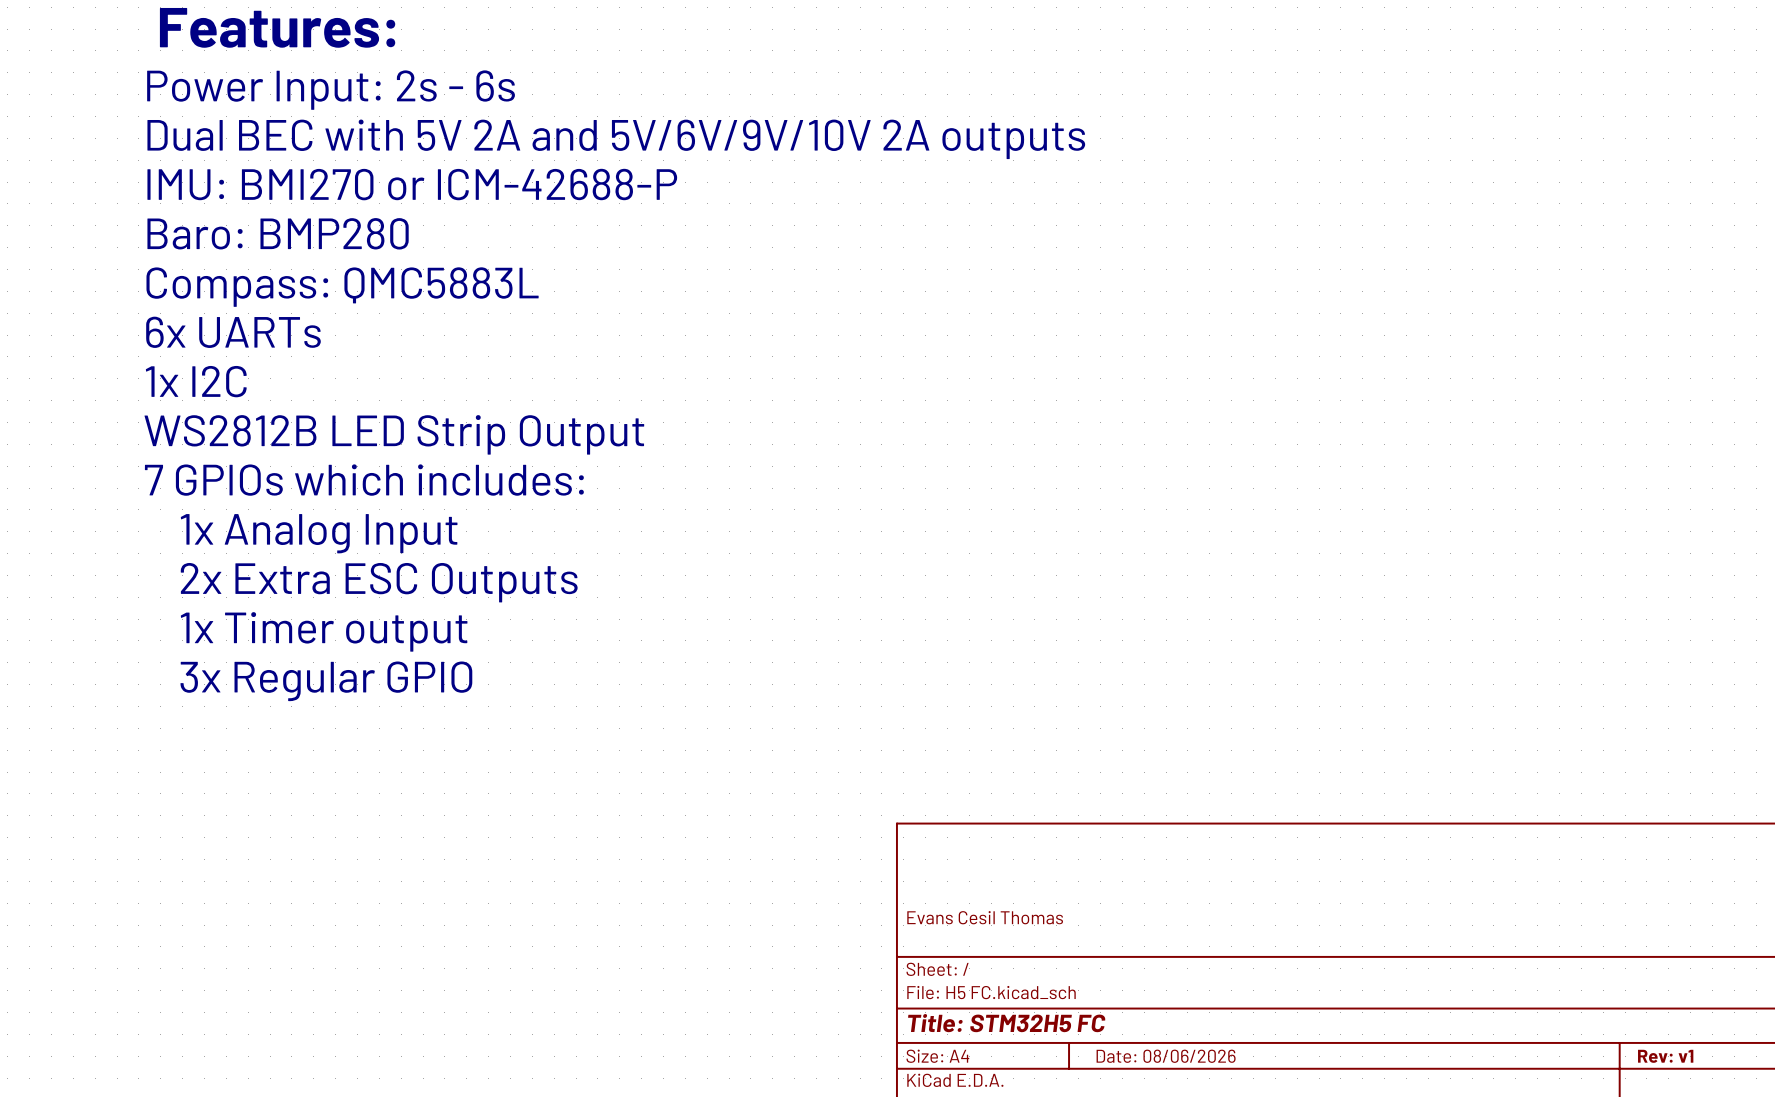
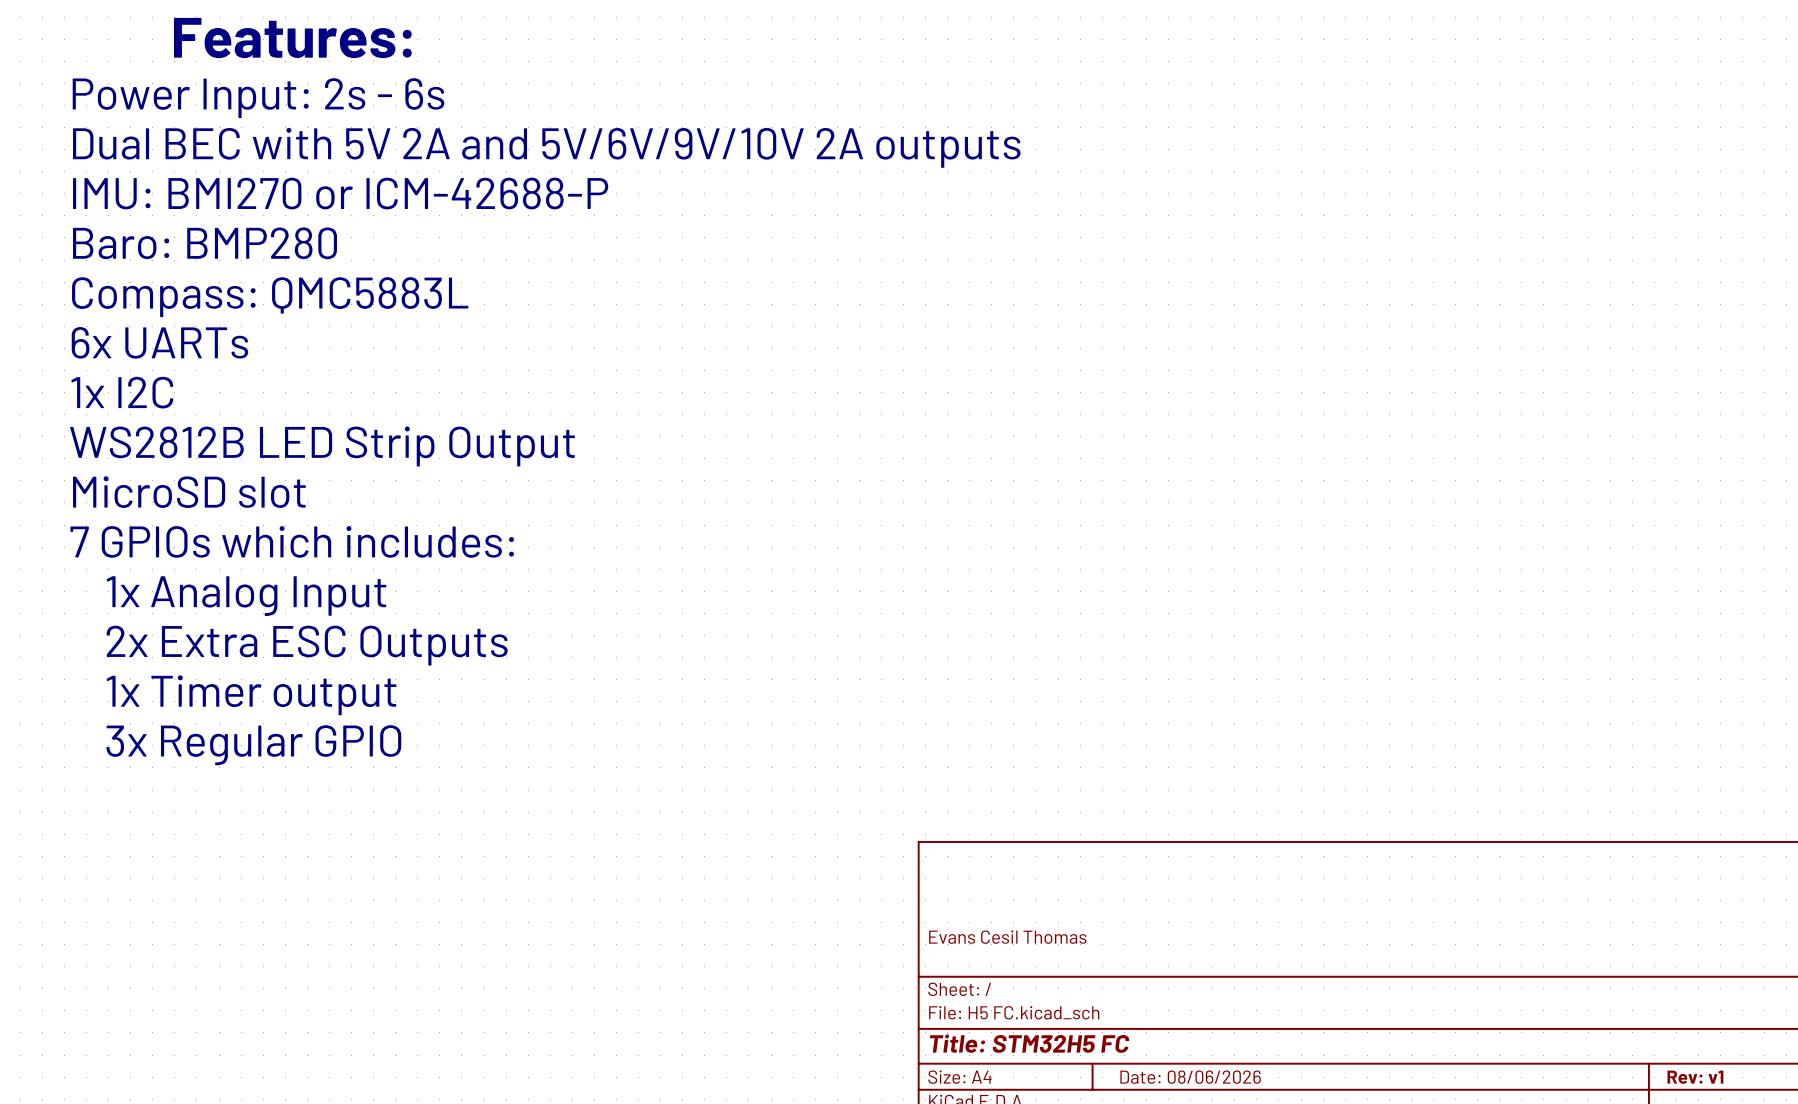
text position: Power Input: 2s - 6s (331, 90) -> Power Input: 2s - 6s (258, 98)
text position: Dual BEC with 5V 2A and 5V/6V/9V/10V 2A outputs (616, 139) -> Dual BEC with 5V 2A and 5V/6V/9V/10V 2A outputs (546, 147)
text position: IMU: BMI270 or ICM-42688-P (412, 184) -> IMU: BMI270 or ICM-42688-P (340, 193)
text position: Baro: BMP280 (278, 233) -> Baro: BMP280 (205, 243)
text position: Compass: QMC5883L (342, 287) -> Compass: QMC5883L (270, 297)
text position: 6x UARTs (233, 332) -> 6x UARTs (159, 342)
text position: 1x I2C (196, 381) -> 1x I2C (122, 392)
text position: WS2812B LED Strip Output (394, 434) -> WS2812B LED Strip Output (322, 446)
text: none -> MicroSD slot (189, 492)
text position: 7 GPIOs which includes: (364, 480) -> 7 GPIOs which includes: (292, 541)
text position: 1x Analog Input (319, 533) -> 1x Analog Input (246, 596)
text position: 2x Extra ESC Outputs (379, 582) -> 2x Extra ESC Outputs (307, 645)
text position: 1x Timer output (324, 631) -> 1x Timer output (251, 695)
text position: 3x Regular GPIO (326, 681) -> 3x Regular GPIO (253, 745)

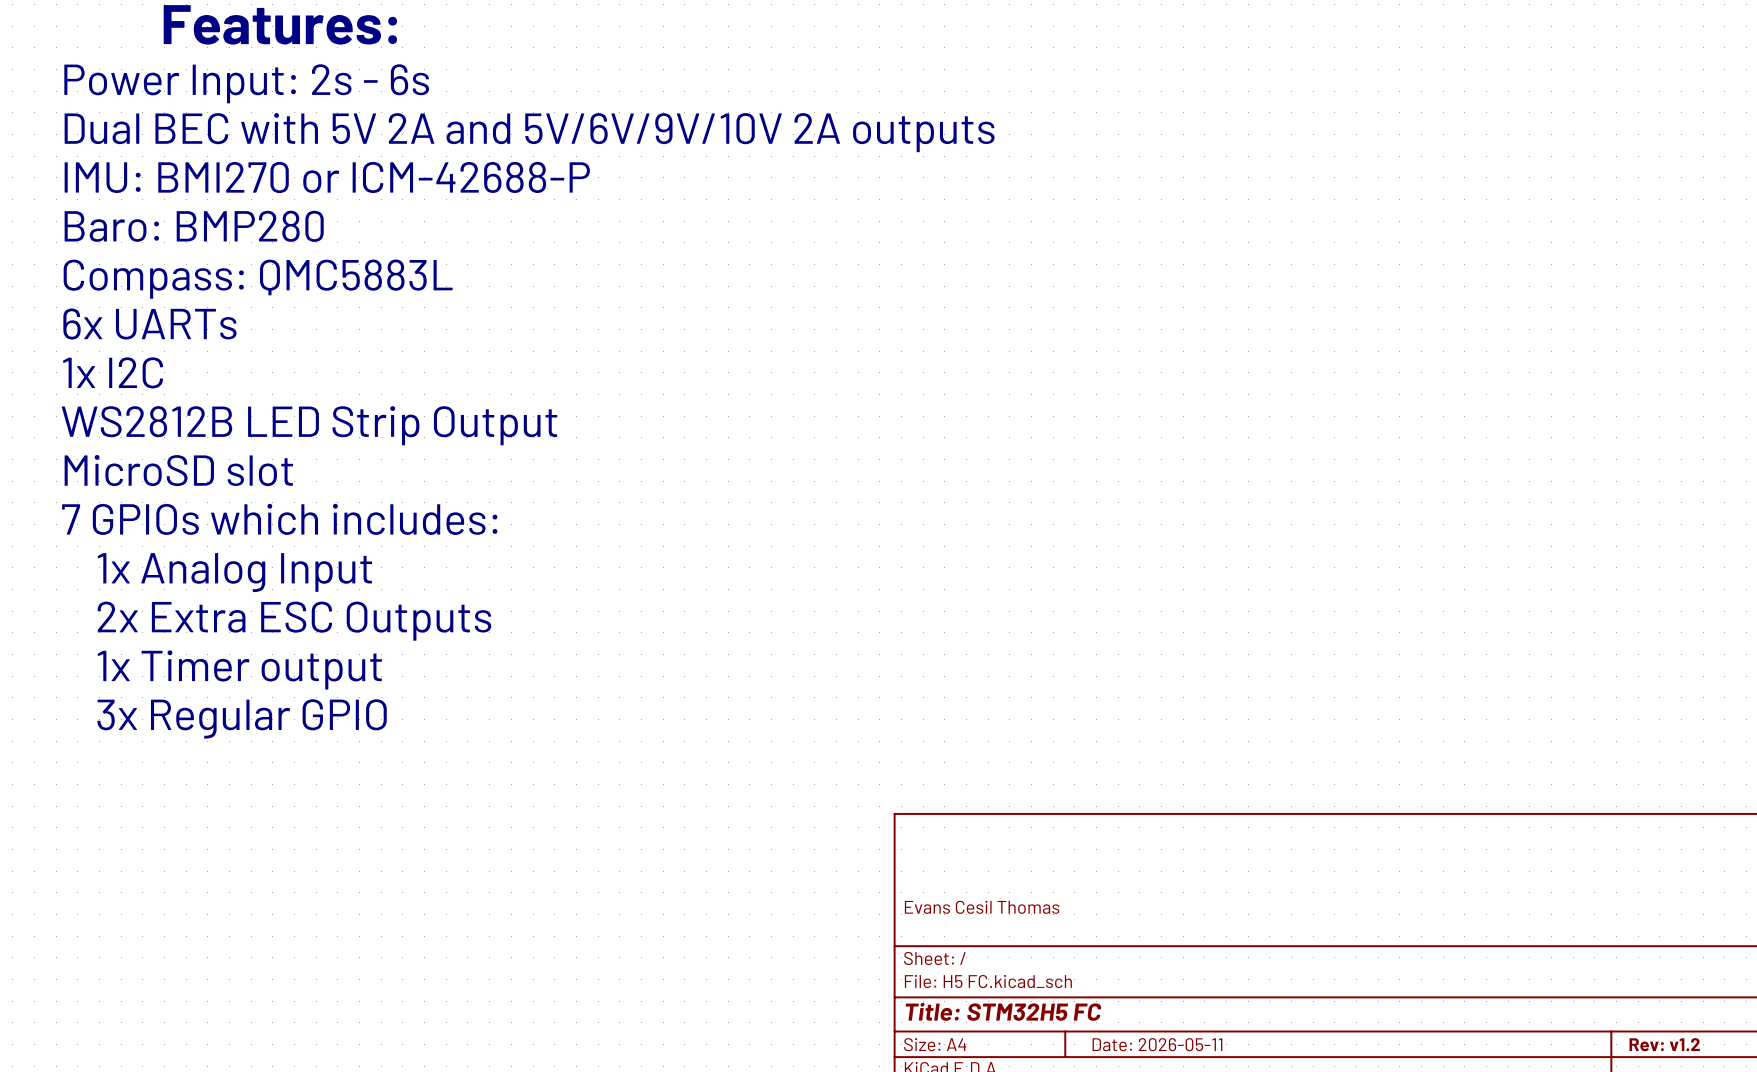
title block: Date: 08/06/2026 (1190, 1077) -> Date: 2026-05-11 (1157, 1044)
title block: Rev: v1 (1695, 1077) -> Rev: v1.2 (1664, 1044)

